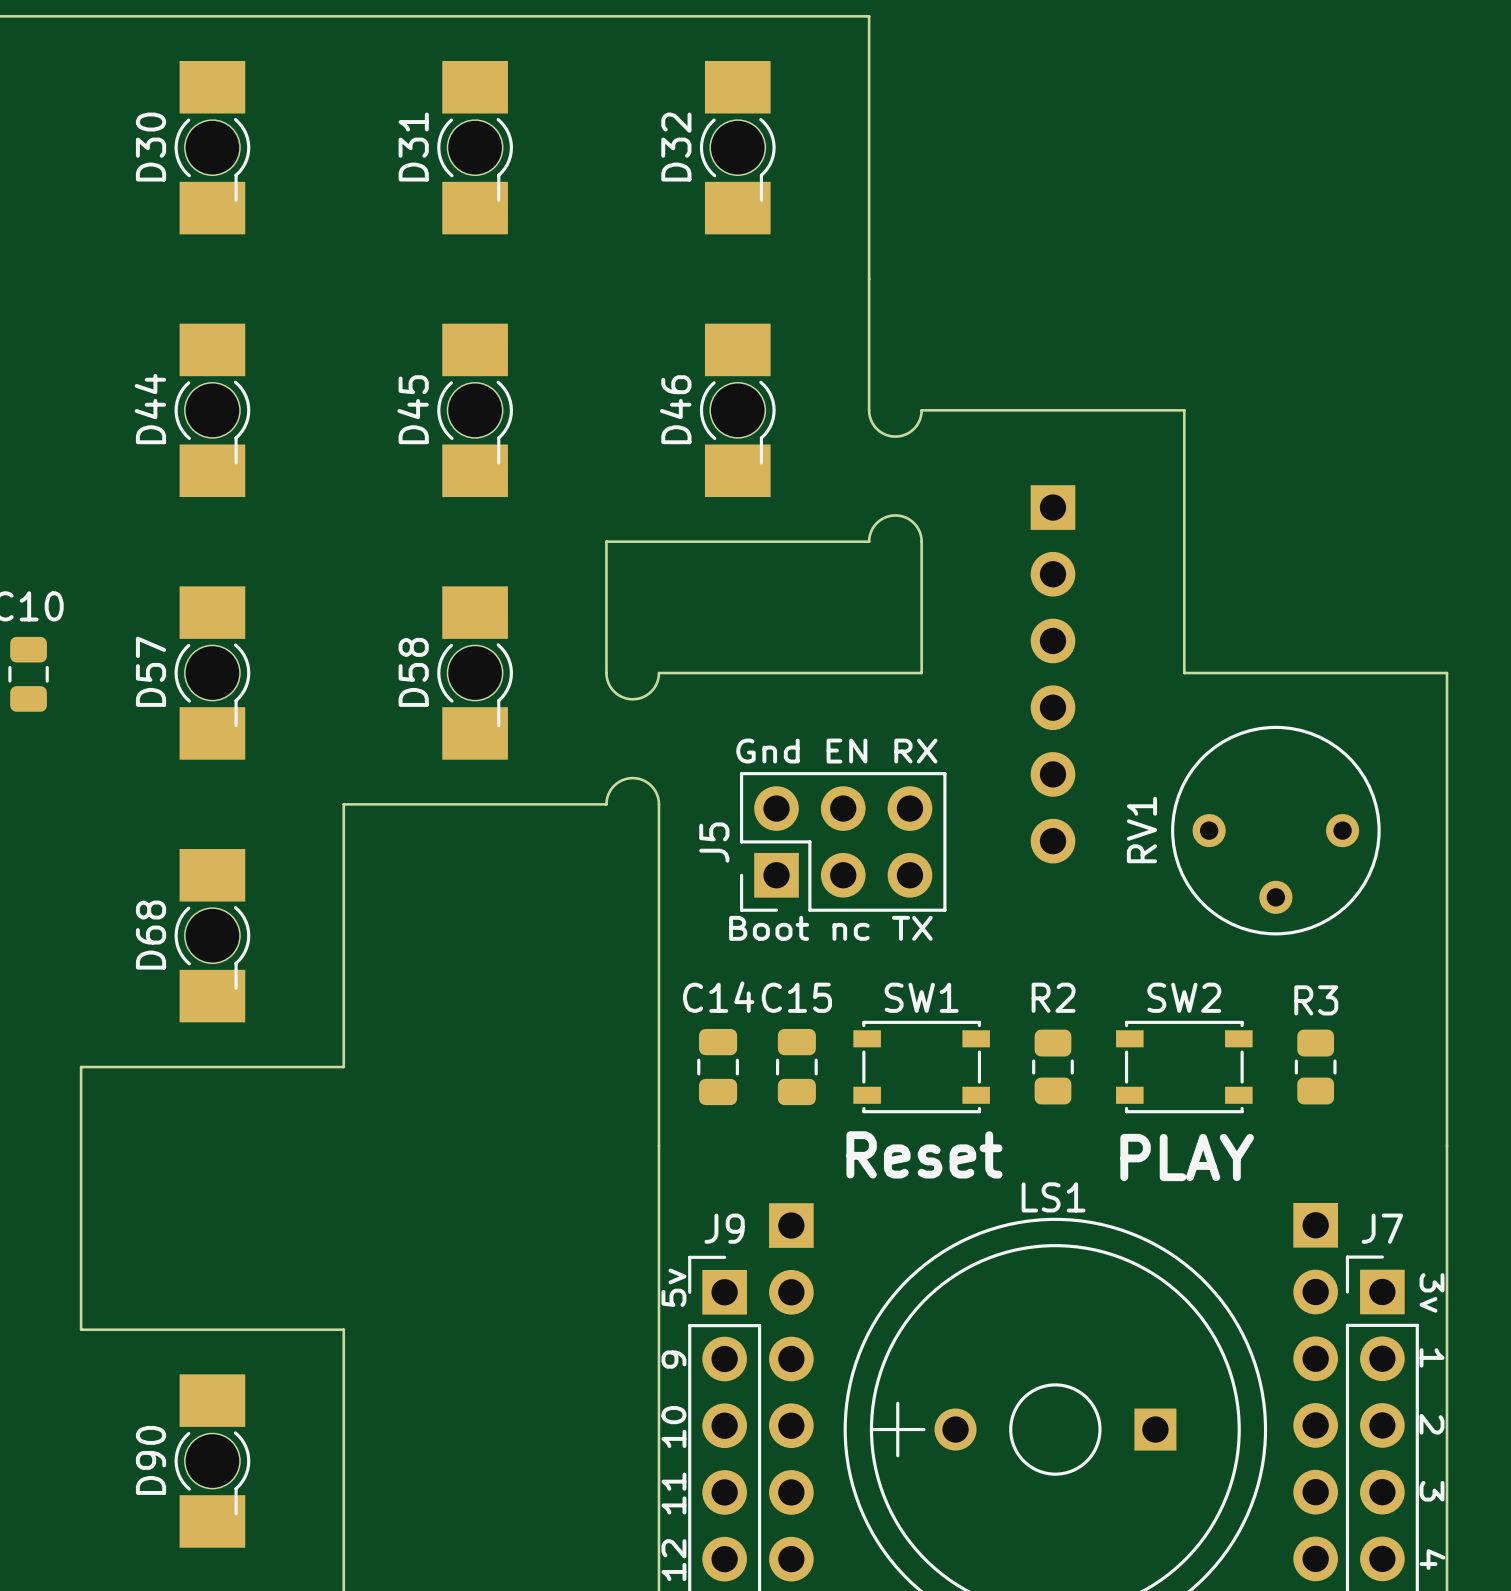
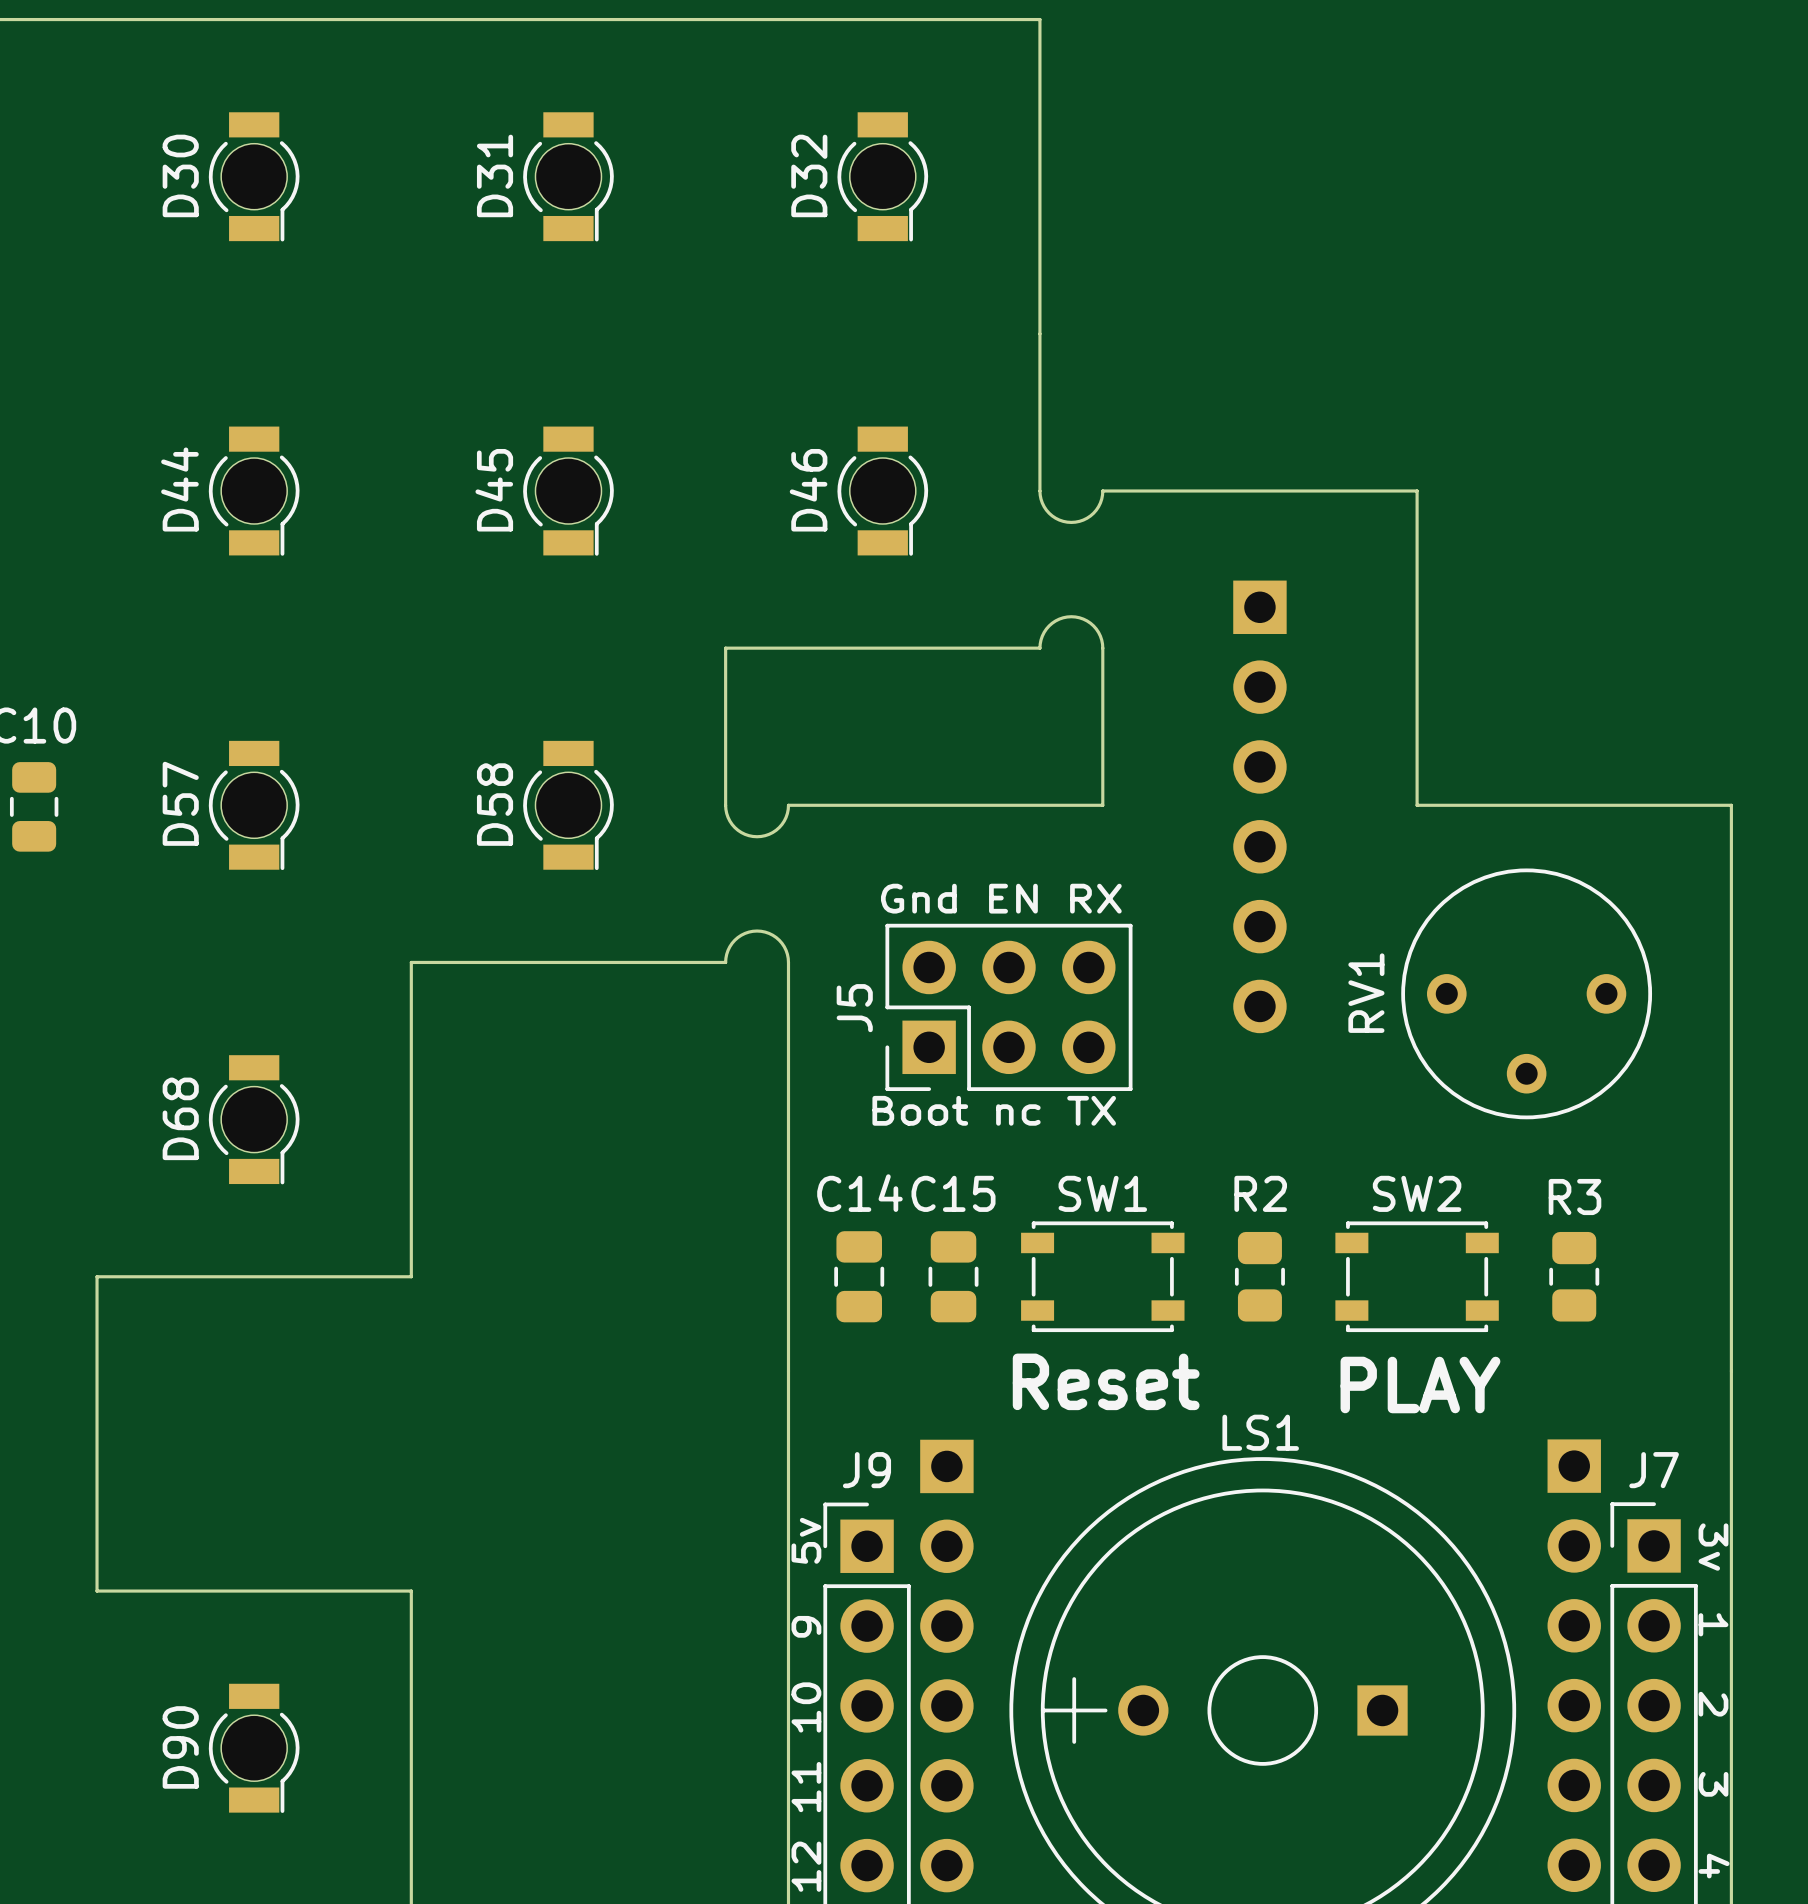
D30 footprint: [174, 60, 251, 235] -> [208, 112, 300, 242]
D31 footprint: [437, 60, 514, 235] -> [523, 112, 614, 242]
D32 footprint: [699, 60, 776, 235] -> [837, 112, 929, 242]
D44 footprint: [174, 323, 251, 498] -> [208, 426, 300, 556]
D45 footprint: [437, 323, 514, 498] -> [523, 426, 614, 556]
D46 footprint: [699, 323, 776, 498] -> [837, 426, 929, 556]
D57 footprint: [174, 586, 251, 760] -> [208, 740, 300, 871]
D58 footprint: [437, 586, 514, 760] -> [523, 740, 614, 871]
D68 footprint: [174, 849, 251, 1023] -> [208, 1055, 300, 1185]
D90 footprint: [174, 1374, 251, 1548] -> [208, 1683, 300, 1813]

